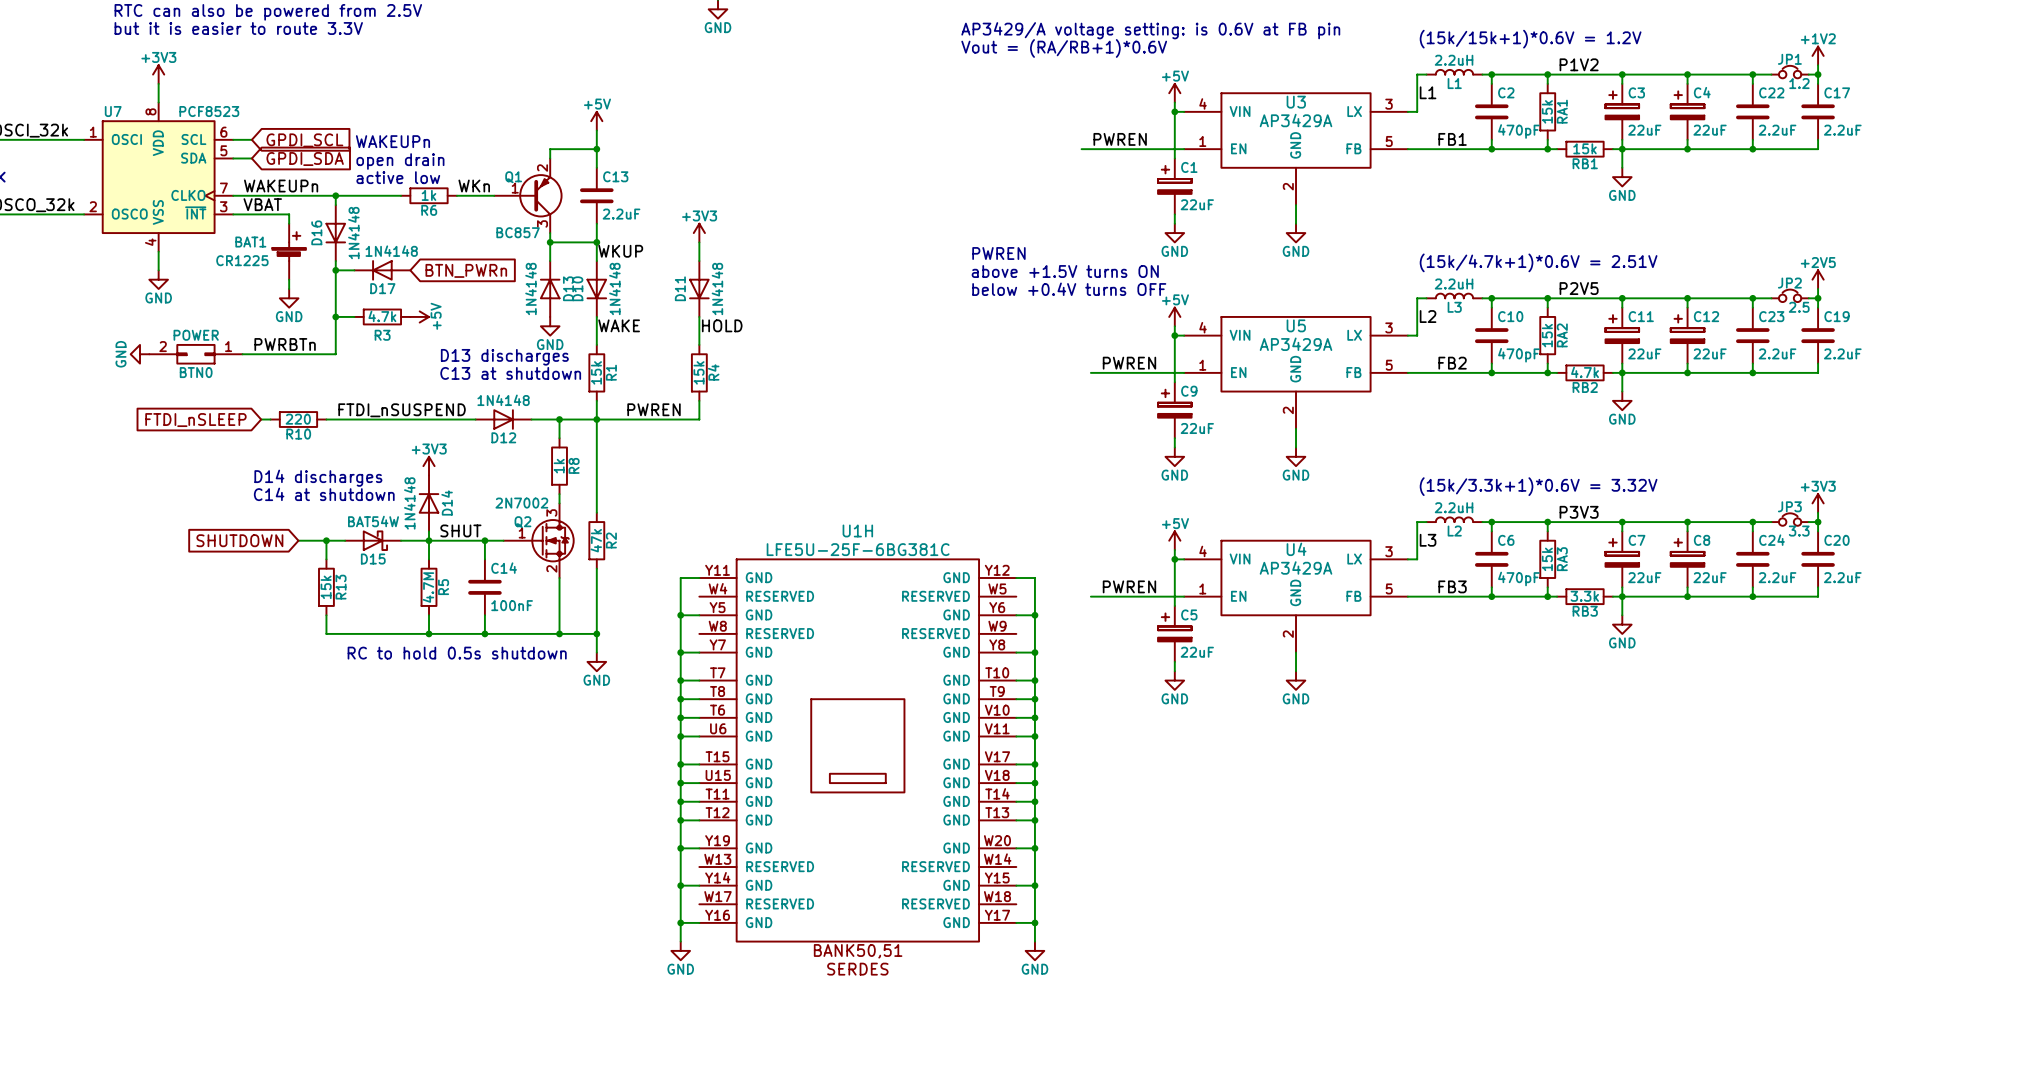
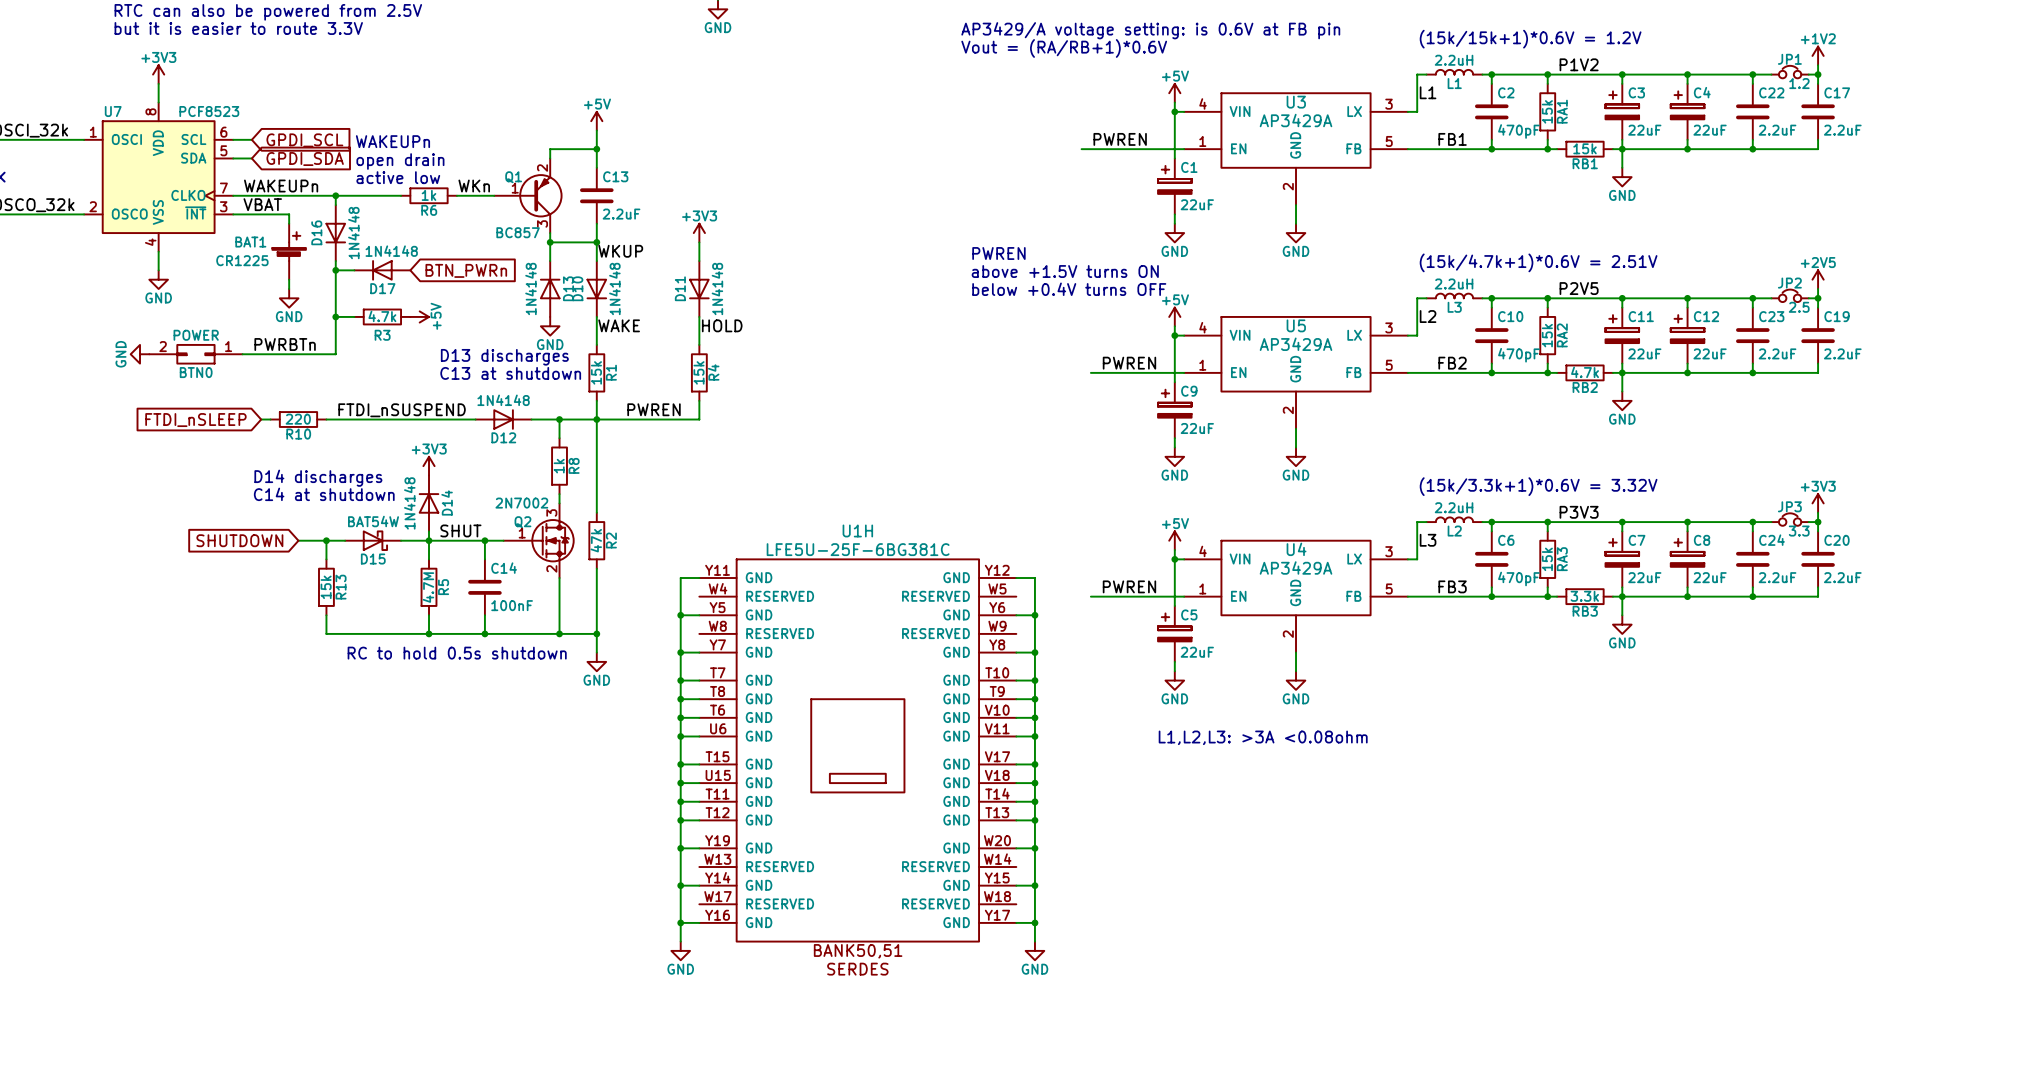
text: none -> L1,L2,L3: >3A <0.08ohm (1263, 737)

